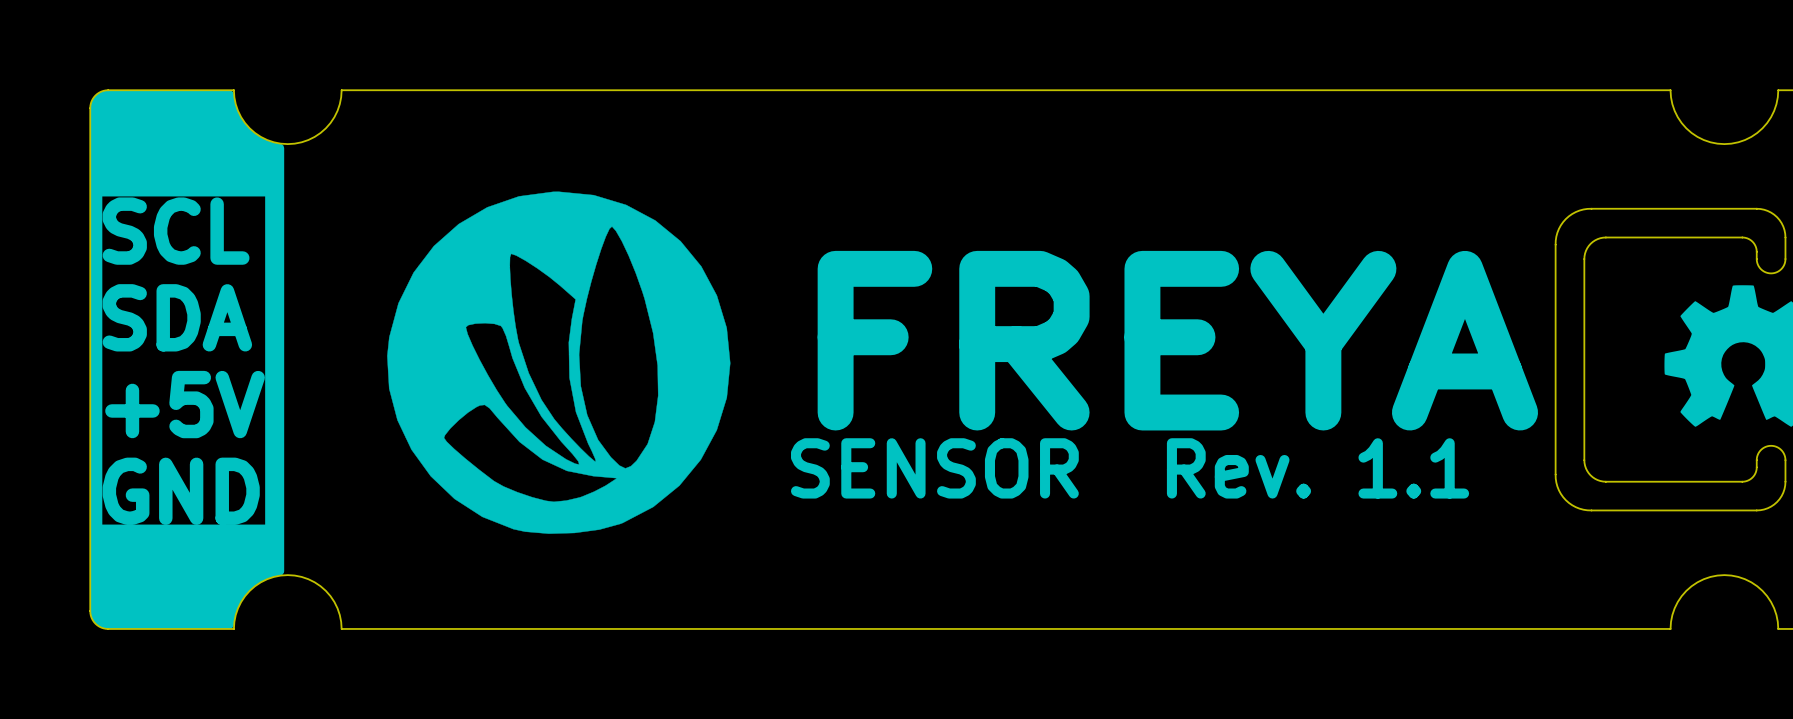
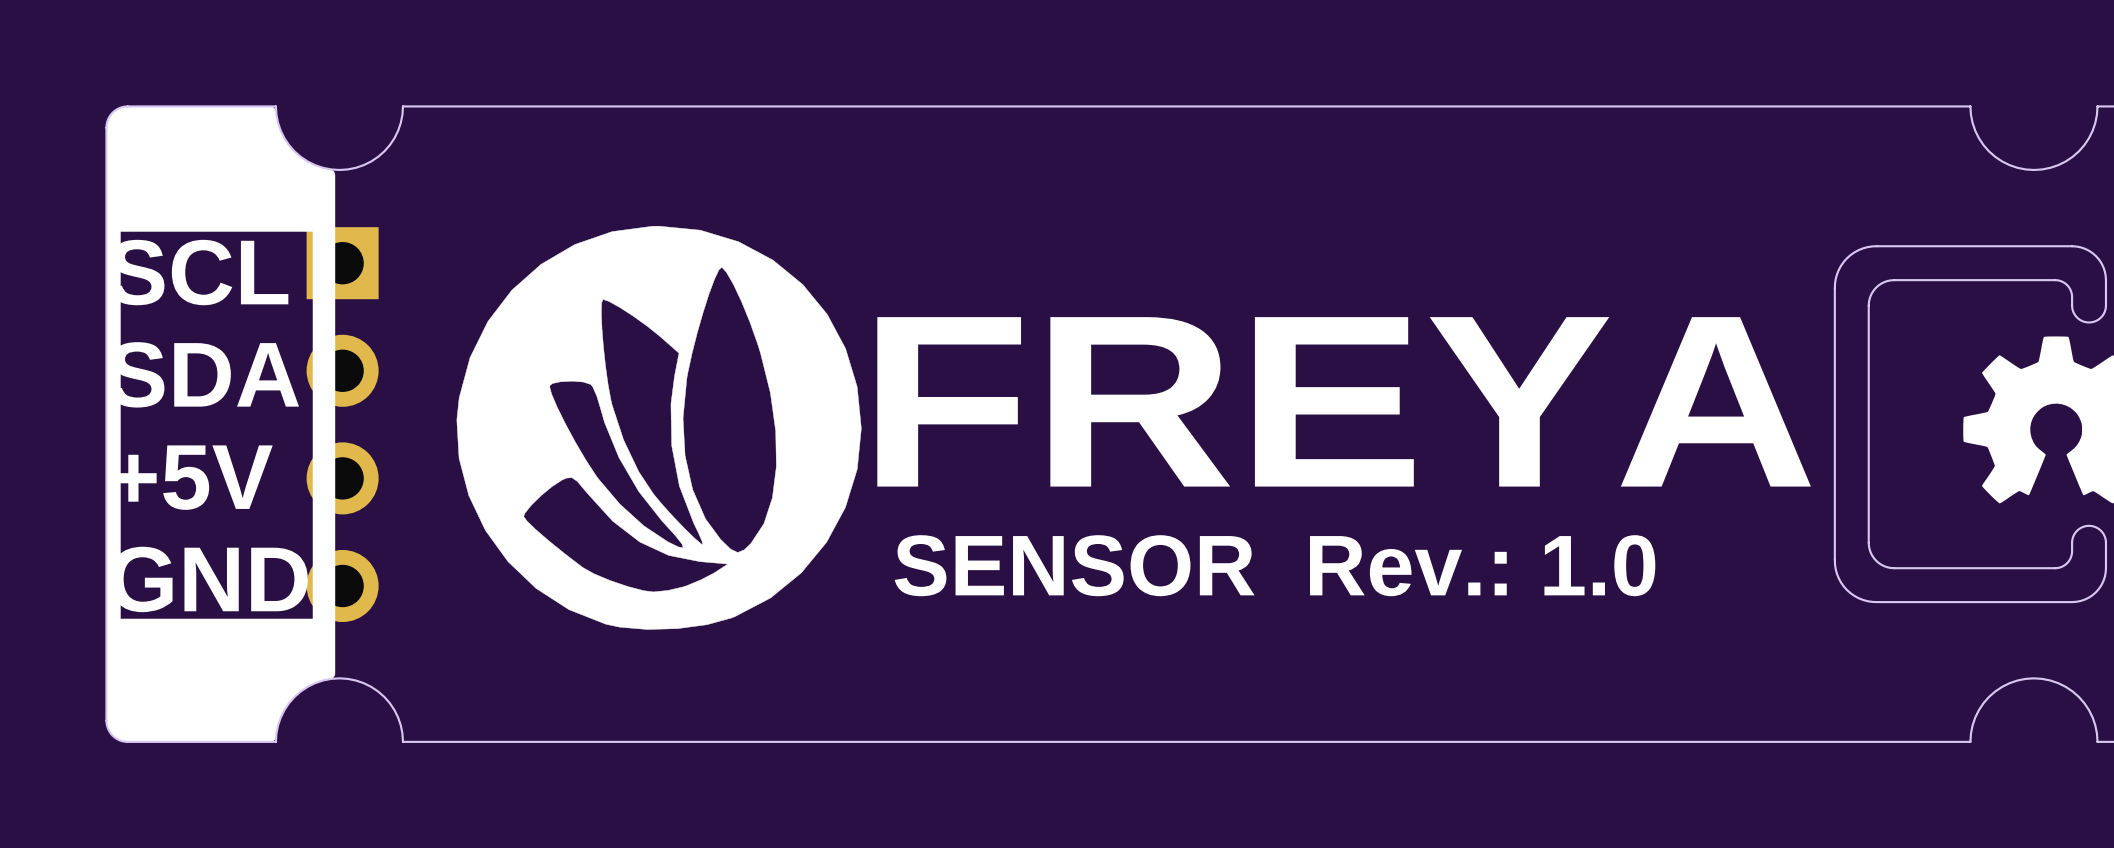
text position: FREYA (1177, 340) -> FREYA (1344, 401)
part: none -> (342, 424)
text: SENSOR Rev. 1.1 (1130, 468) -> SENSOR Rev.: 1.0 (1275, 565)

